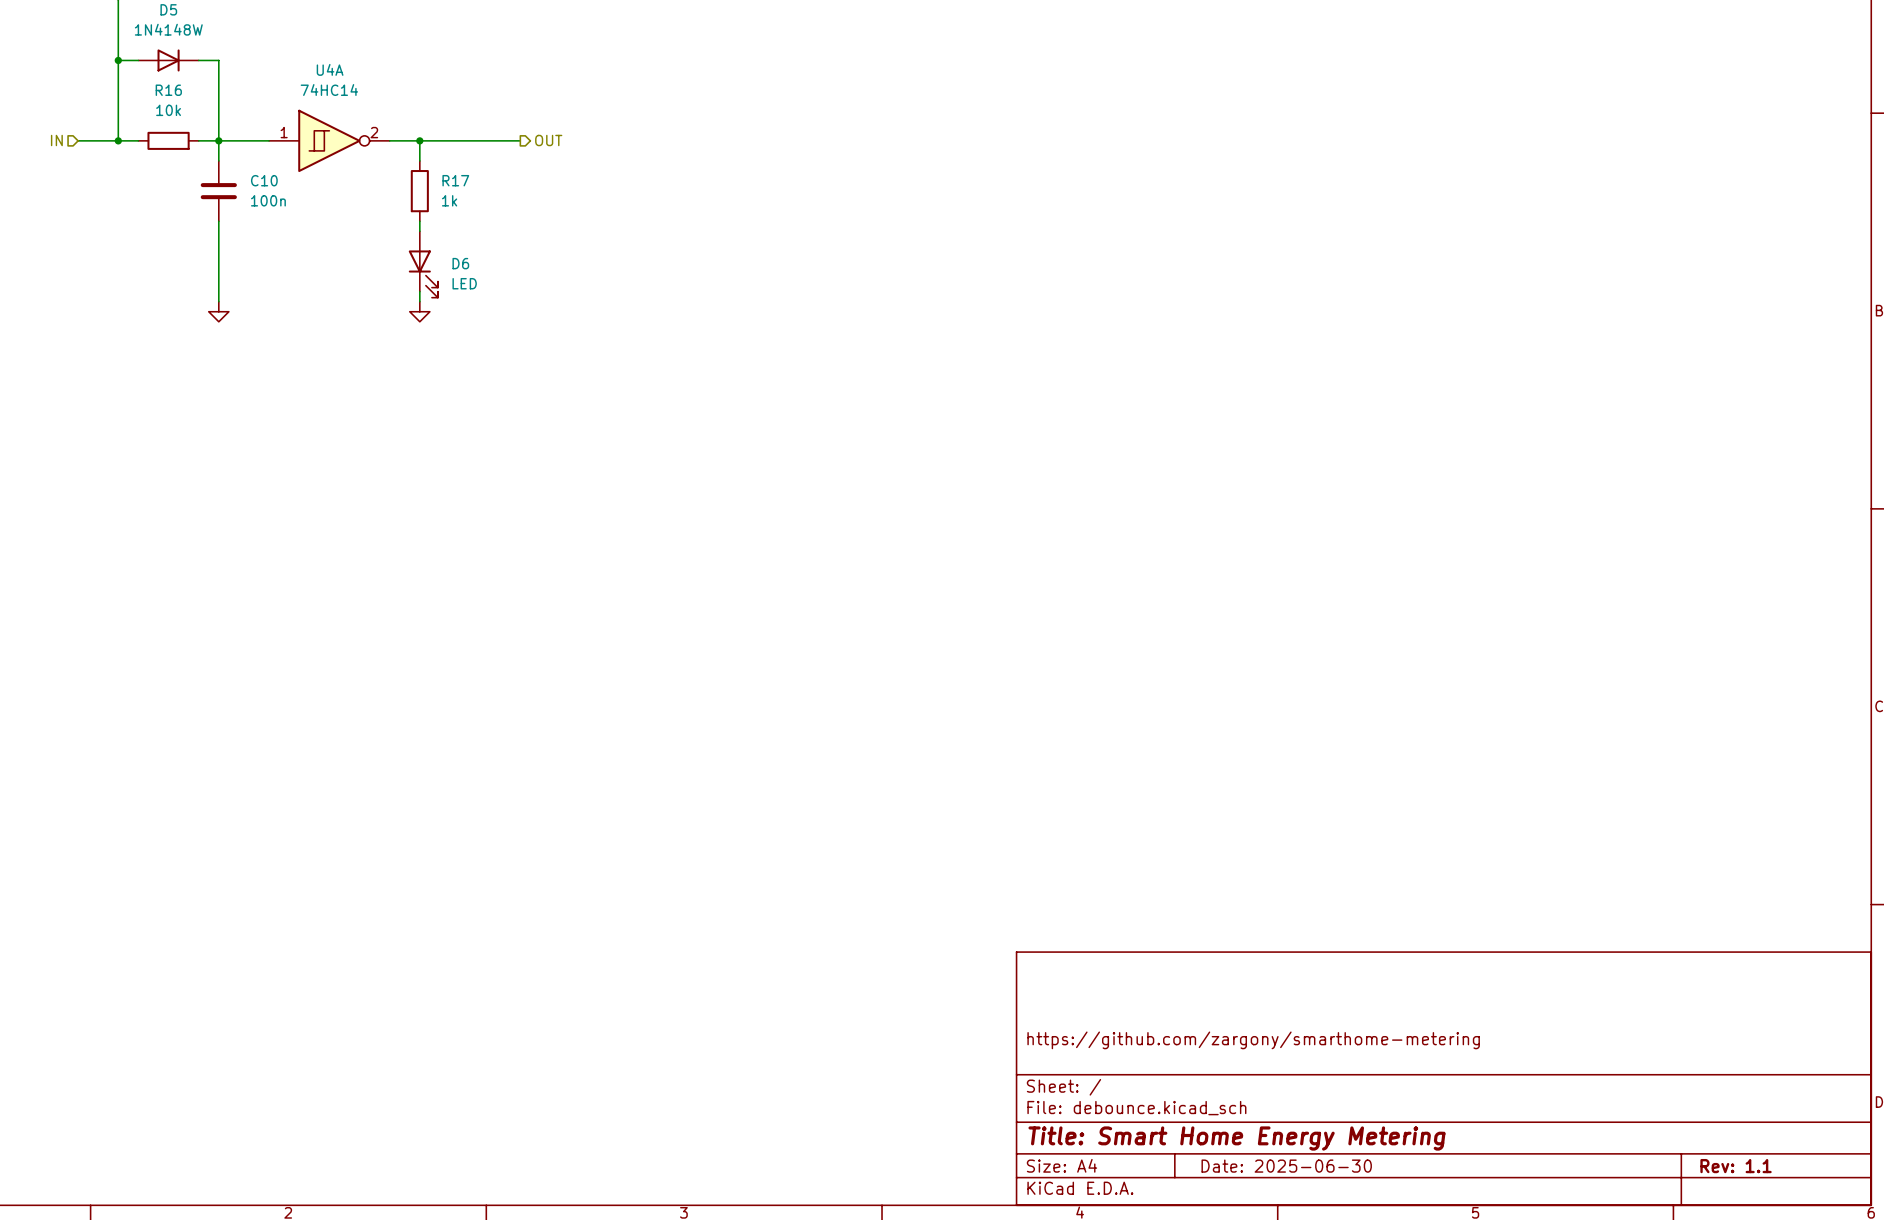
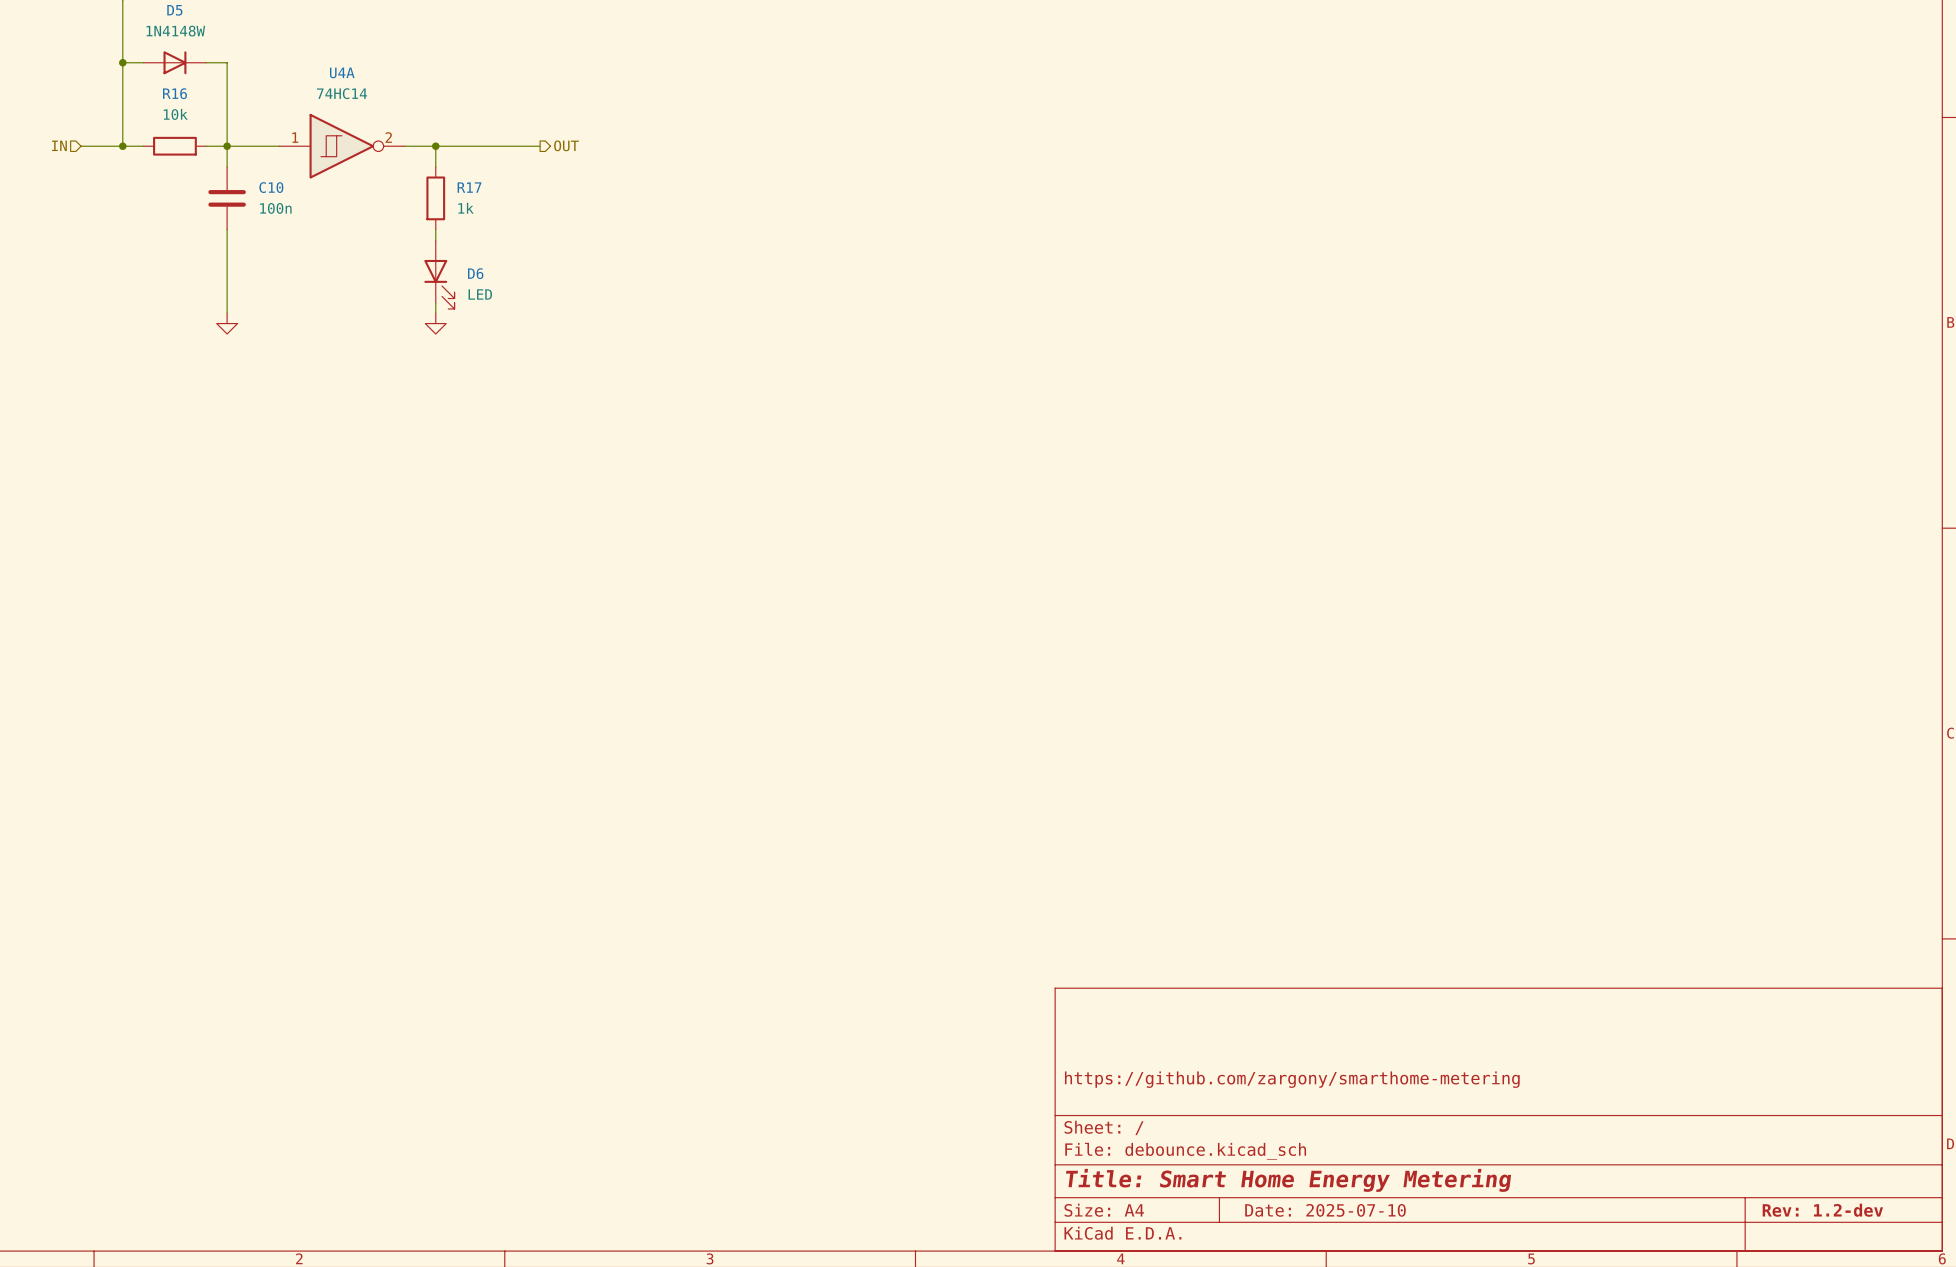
title block: Date: 2025-06-30 (1286, 1166) -> Date: 2025-07-10 (1325, 1210)
title block: Rev: 1.1 (1736, 1166) -> Rev: 1.2-dev (1822, 1210)

